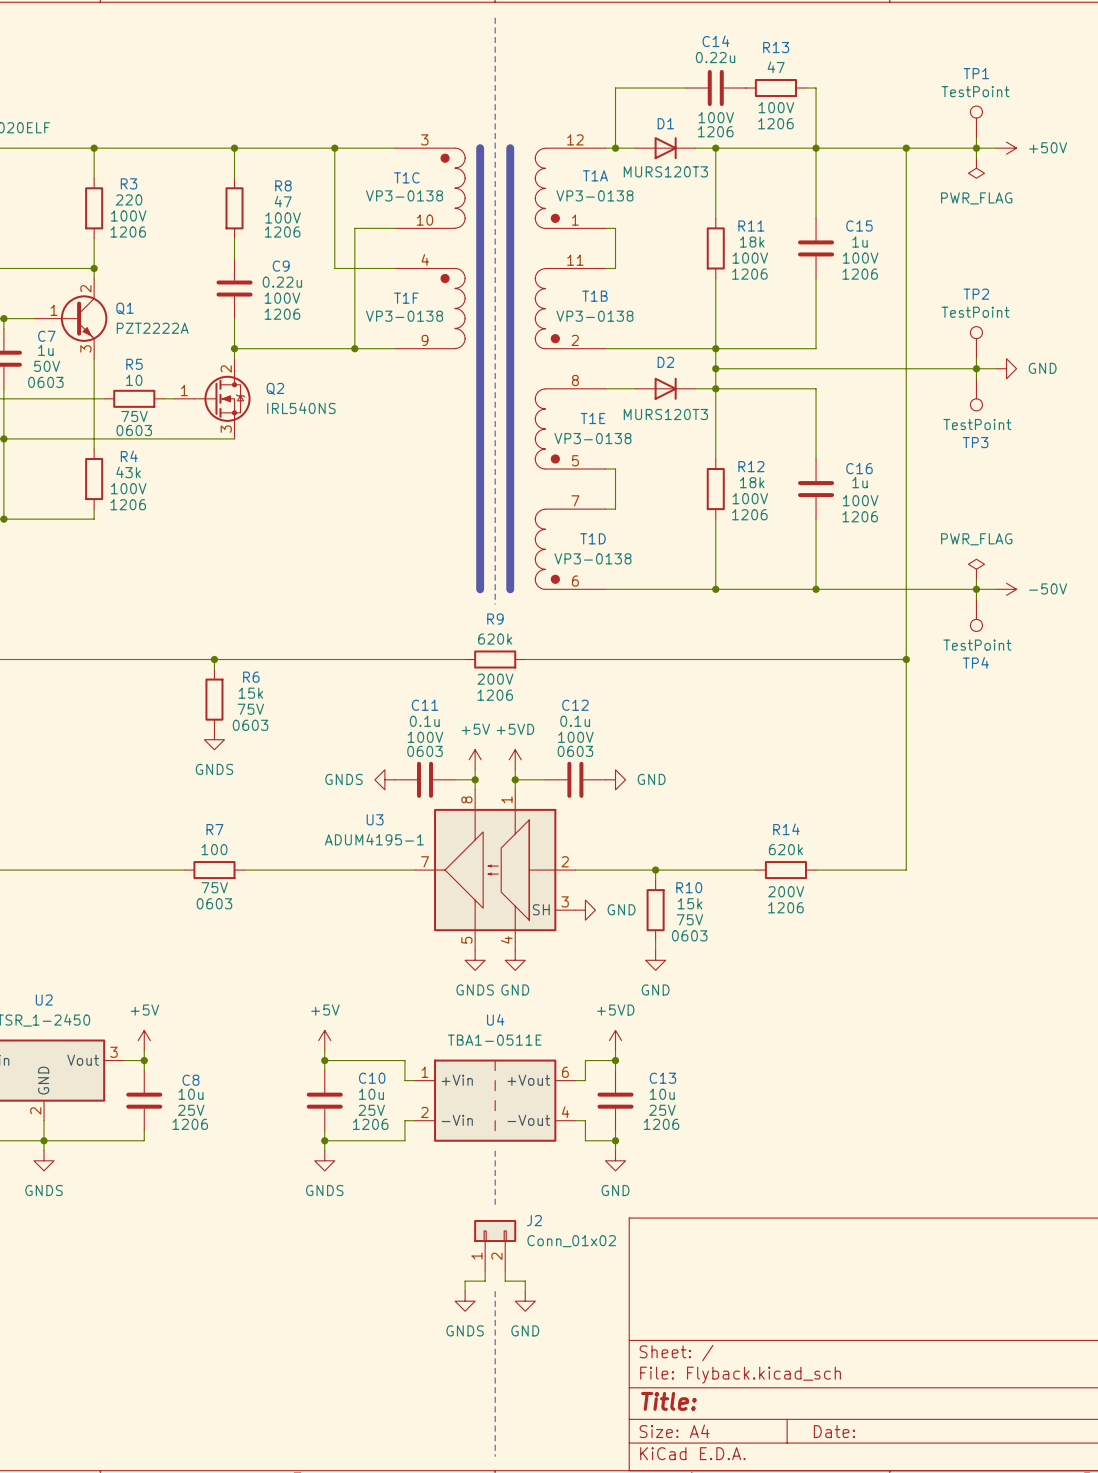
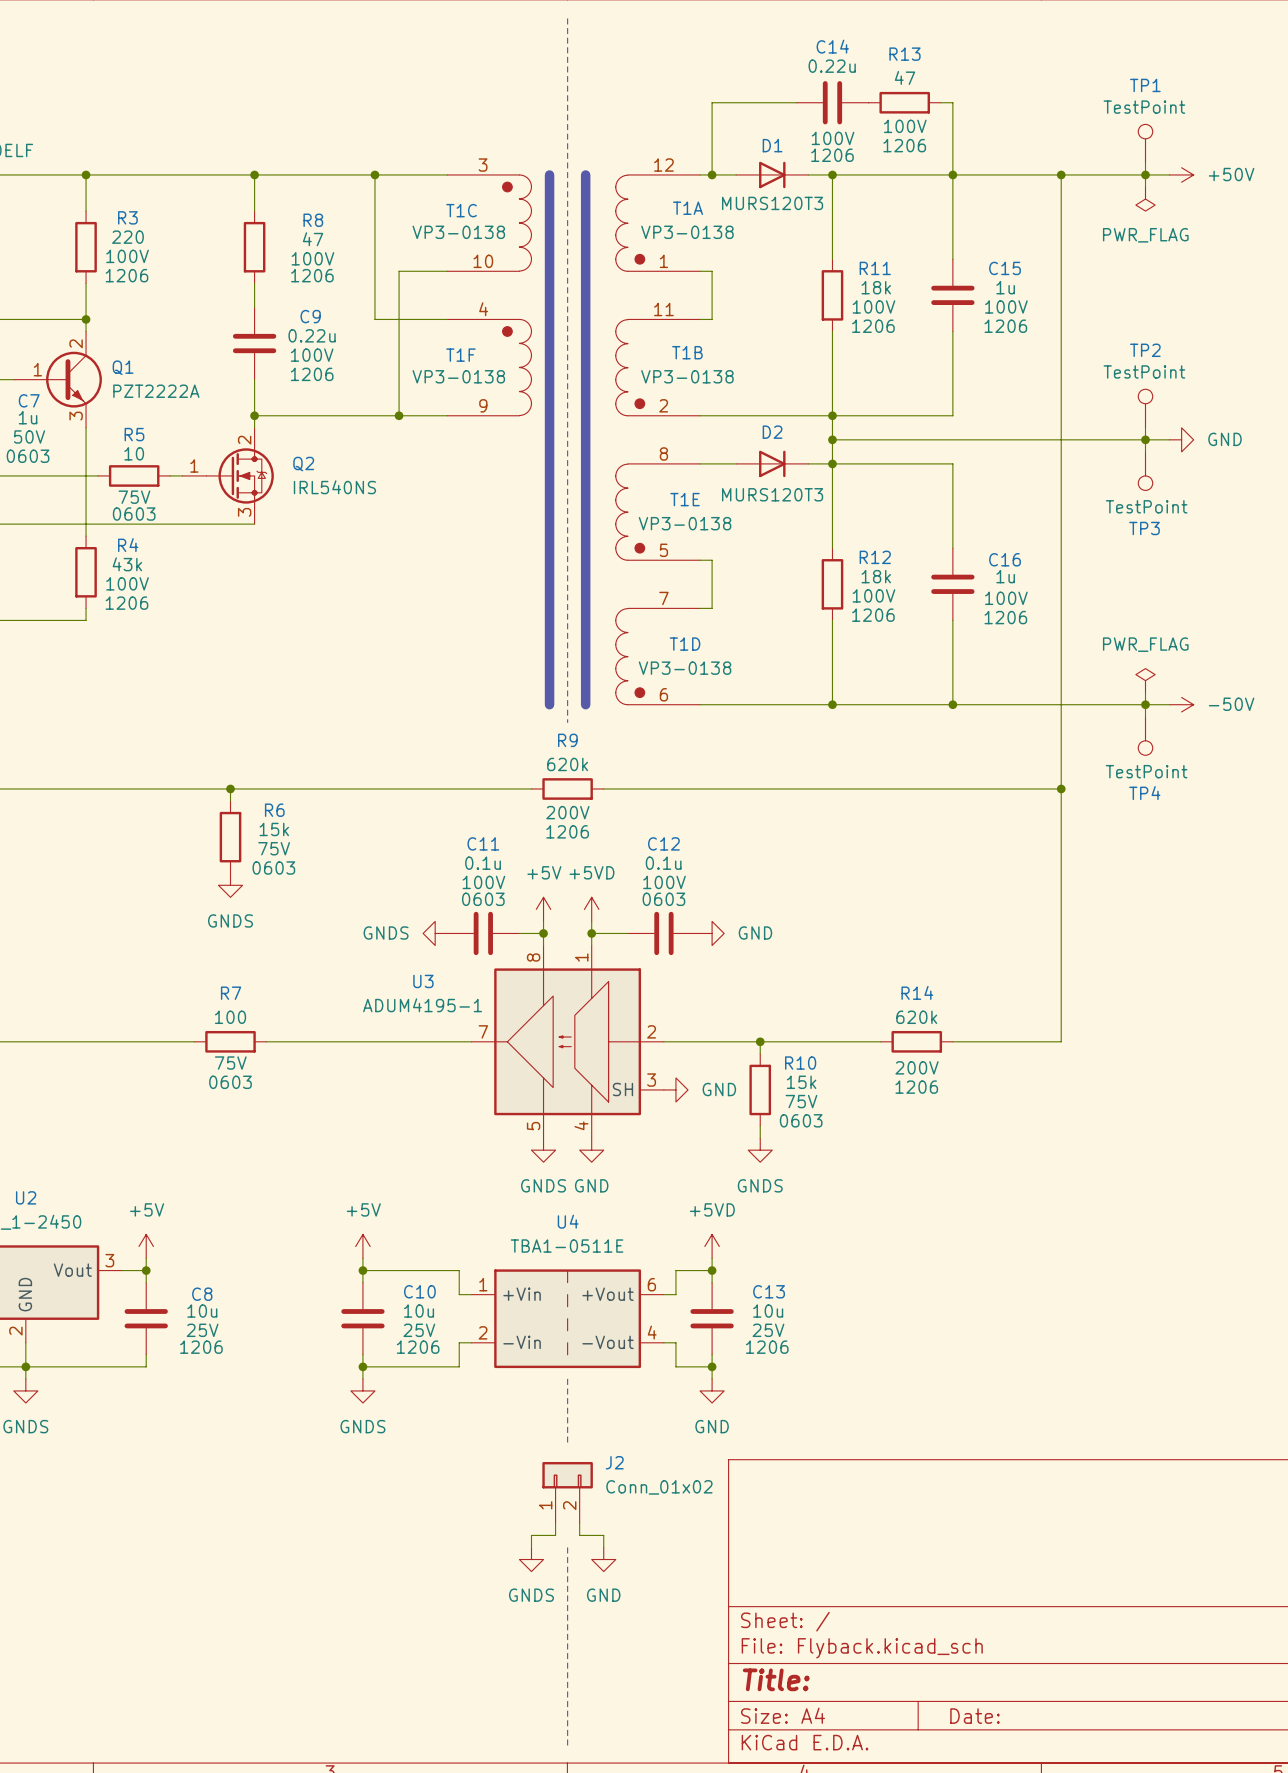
power symbol: GND (655, 960) -> GNDS (760, 1150)

